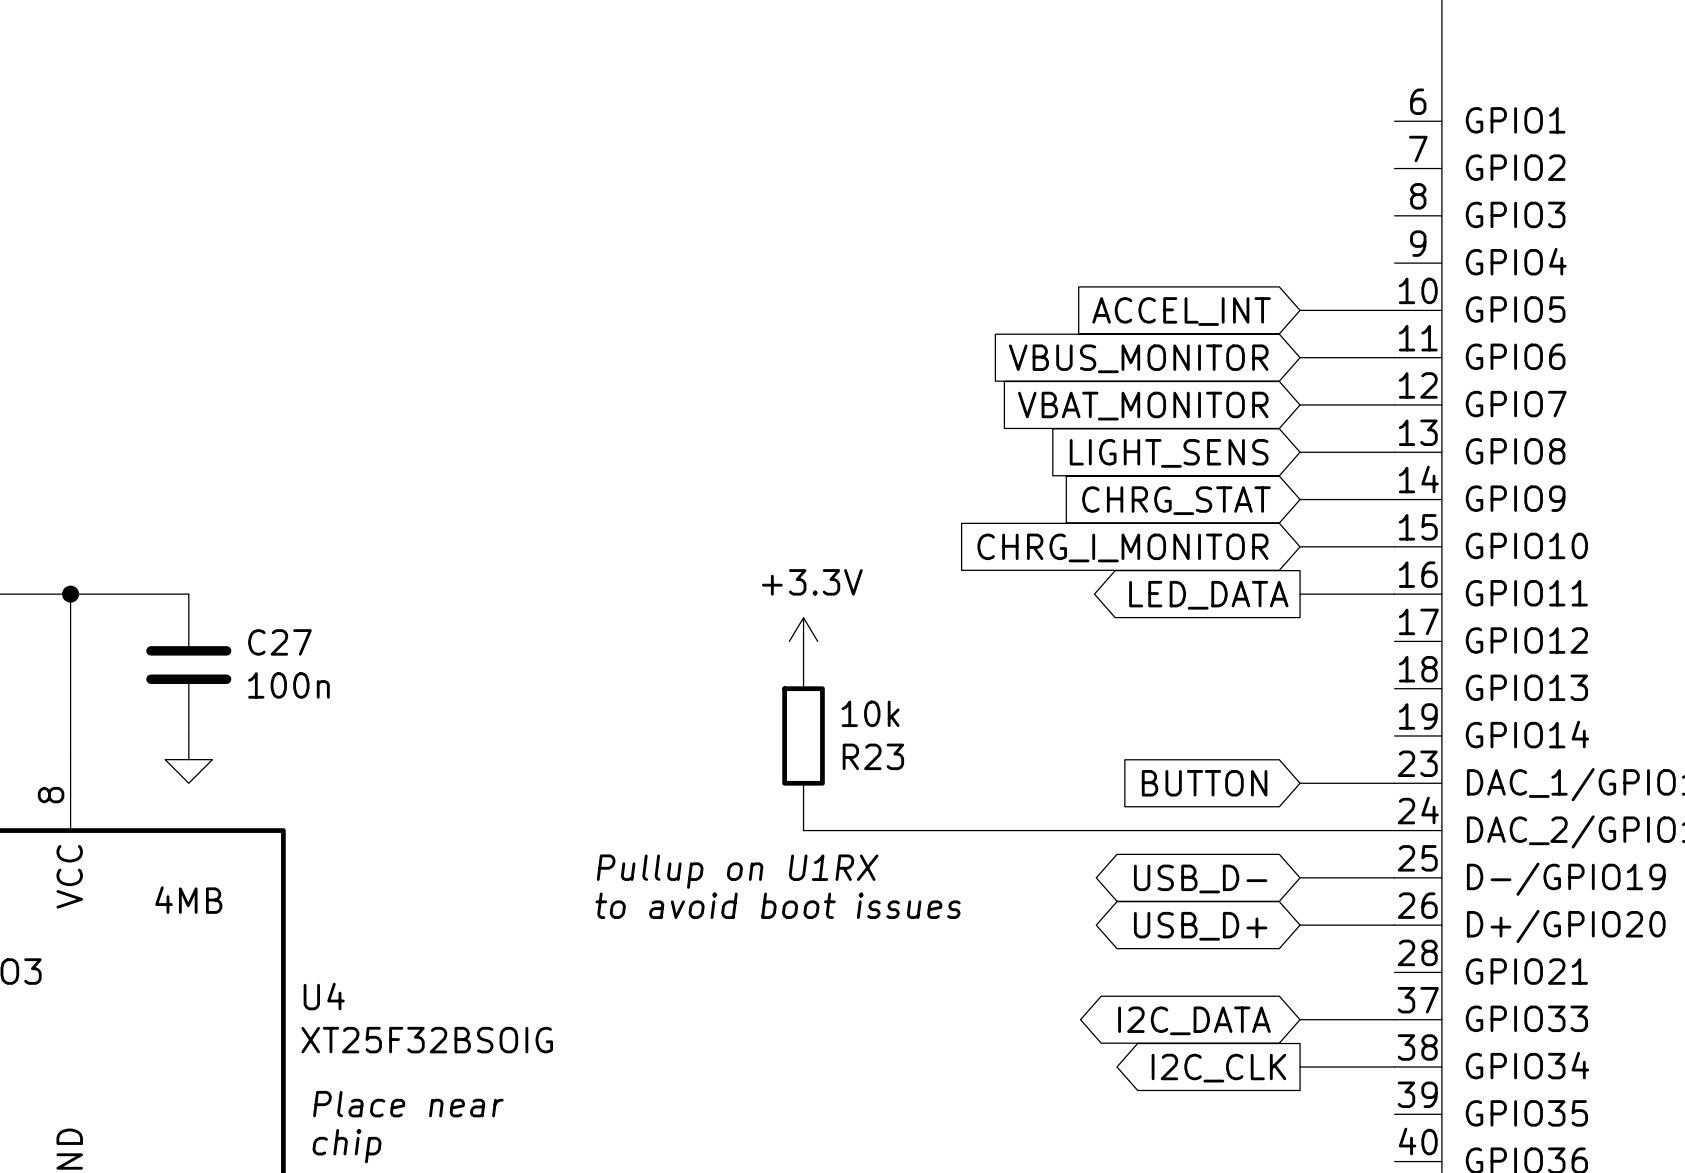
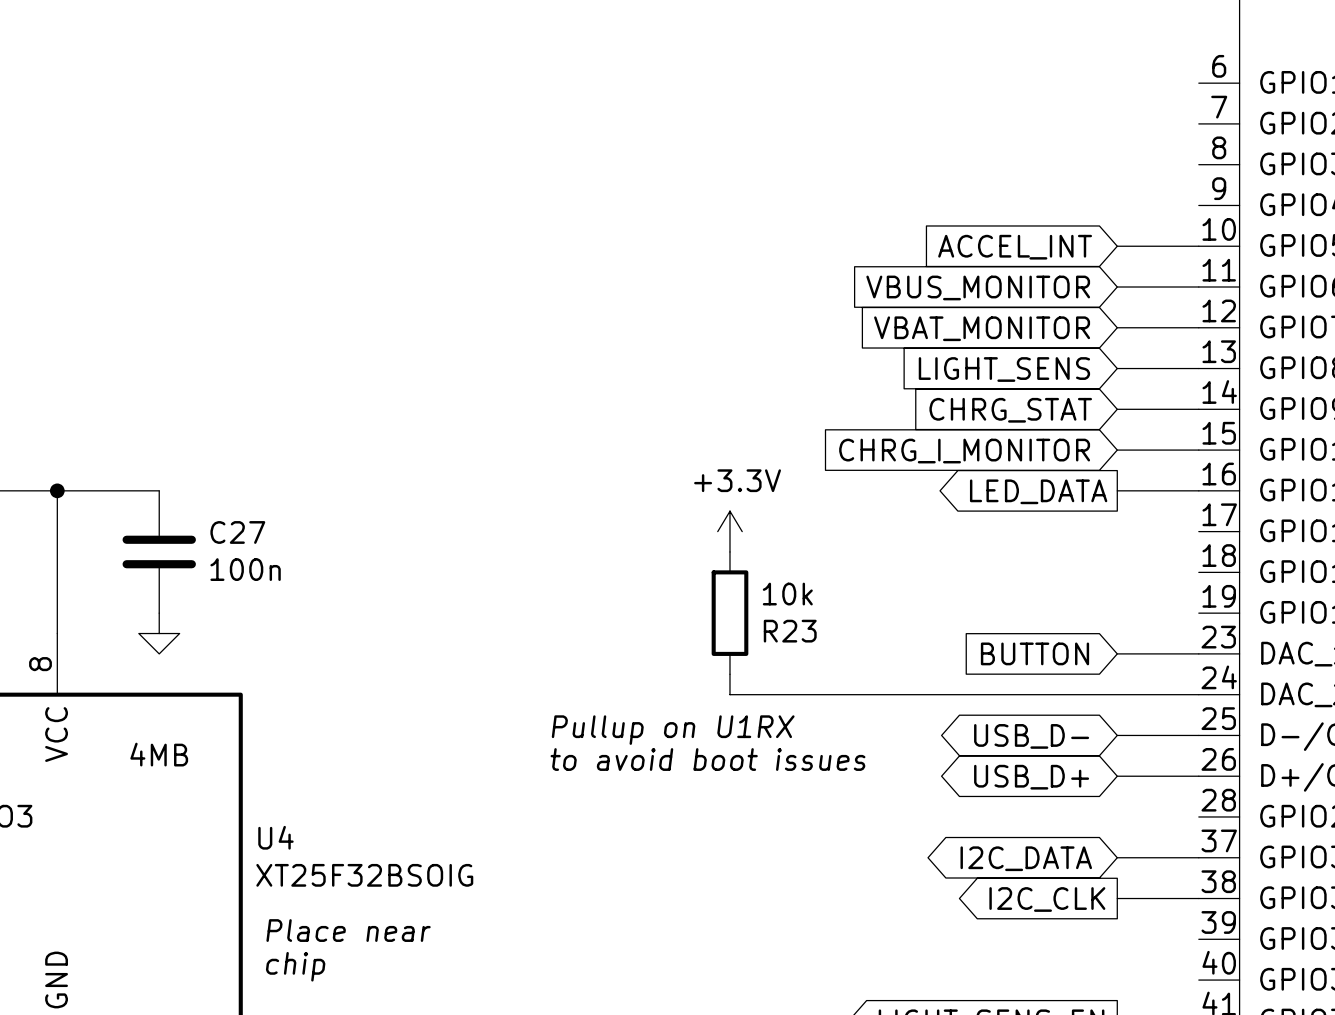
power symbol position: +3.3V (803, 641) -> +3.3V (729, 531)
R23 position: (803, 735) -> (729, 613)
wire: (803, 806) (803, 830) (850, 830) -> (729, 674) (729, 694)
text position: Pullup on U1RX (737, 871) -> Pullup on U1RX (673, 730)
text position: to avoid boot issues (778, 905) -> to avoid boot issues (708, 759)

